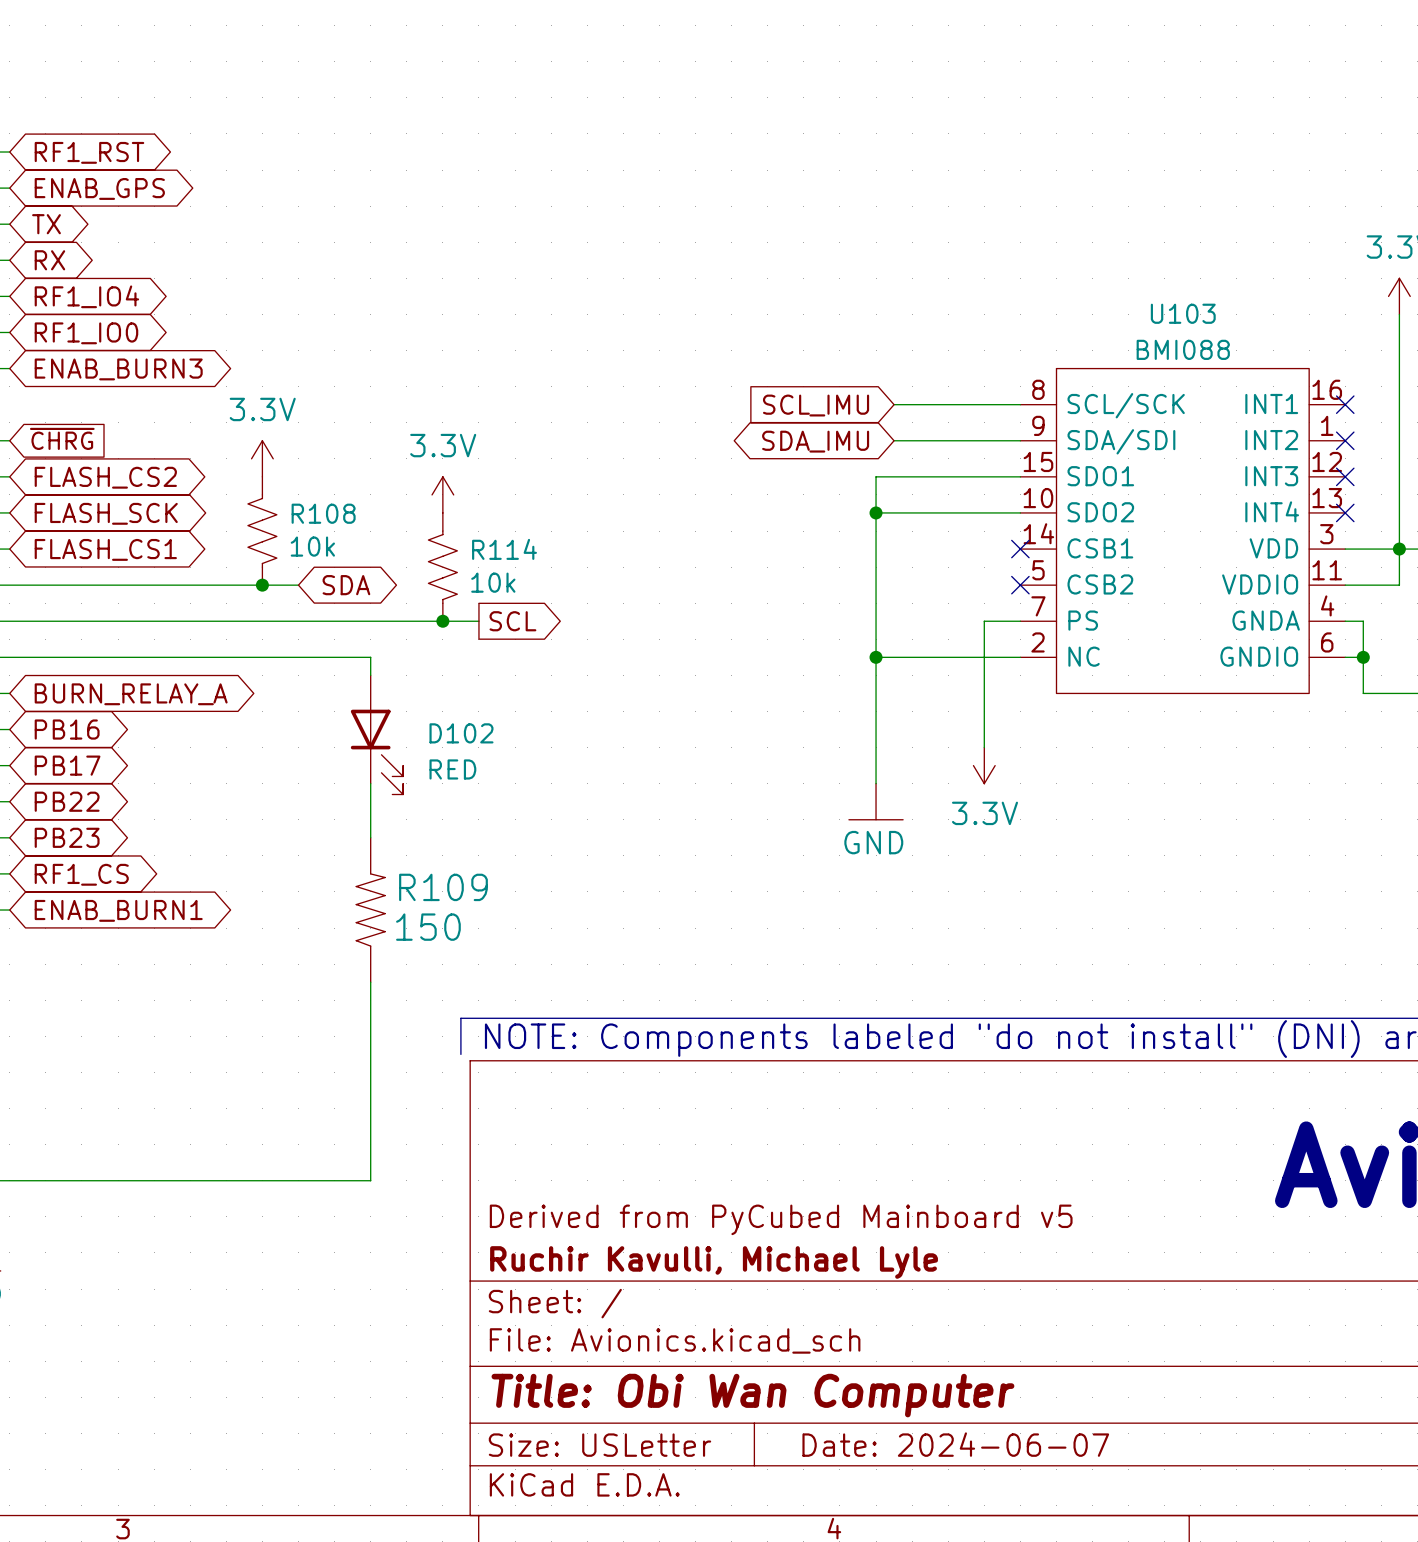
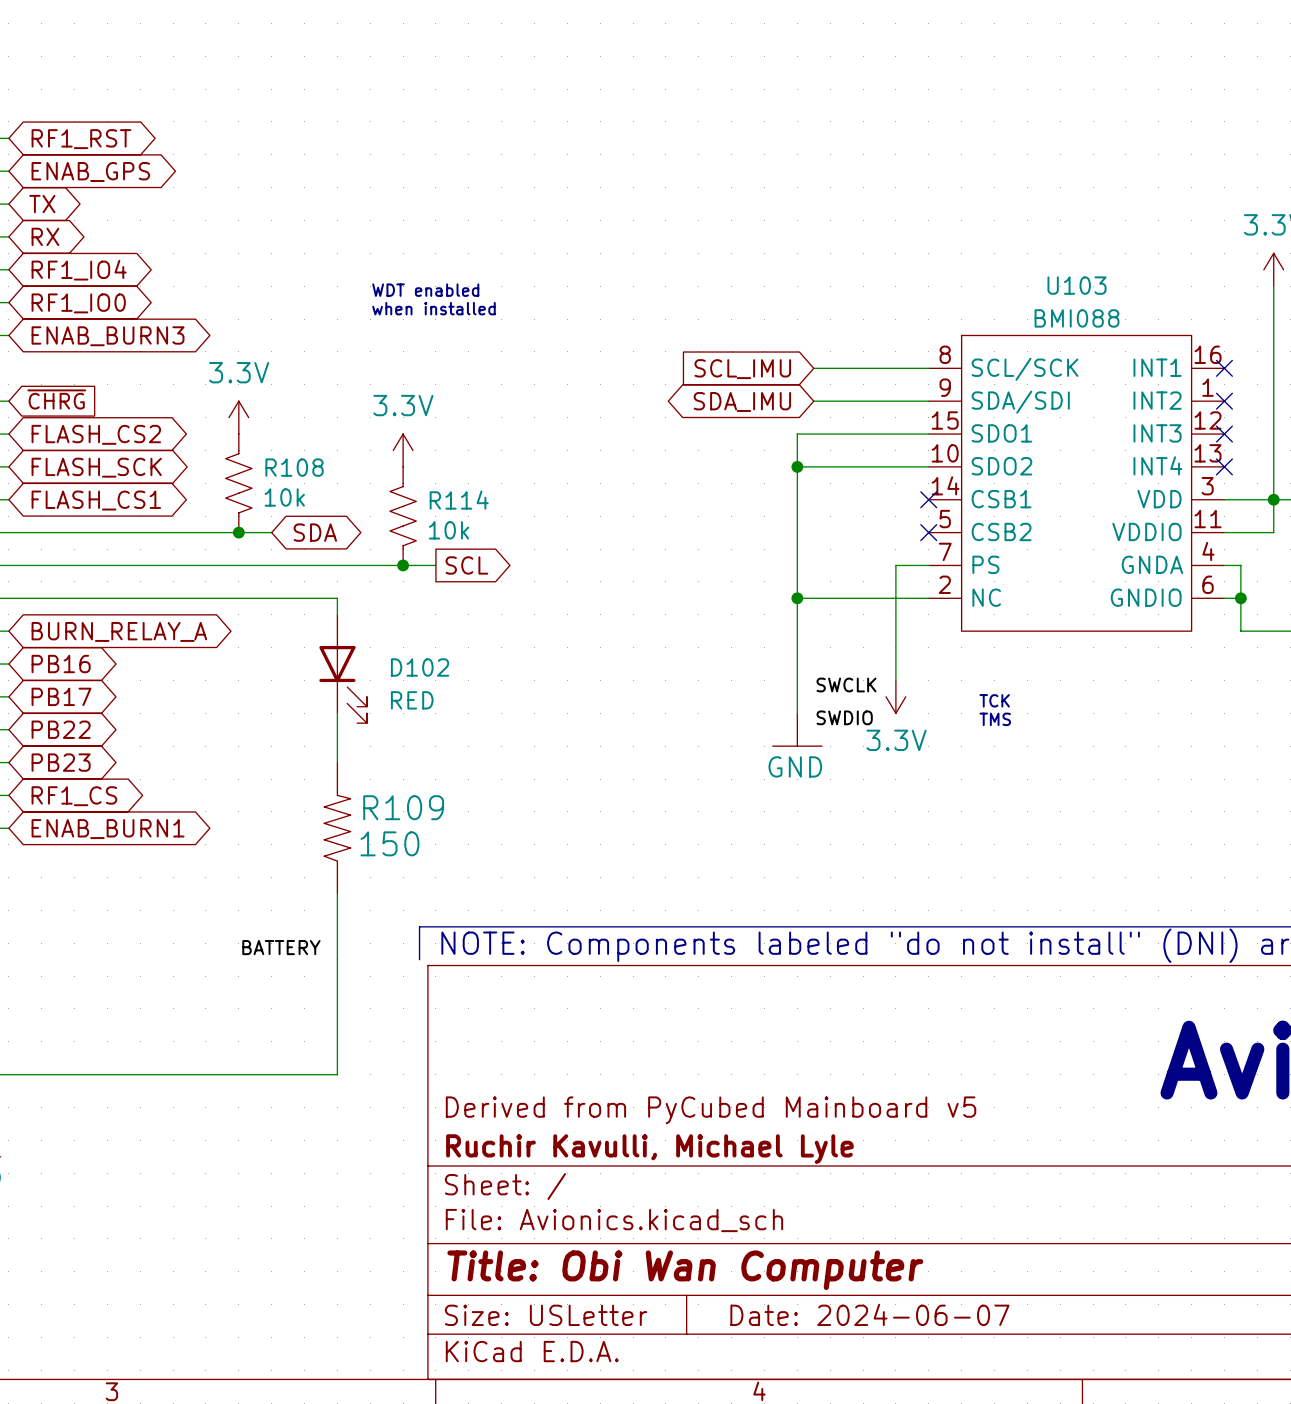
text: none -> WDT enabled (425, 290)
text: none -> when installed (433, 308)
label: none -> SWCLK (846, 685)
text: none -> TCK (994, 700)
label: none -> SWDIO (844, 717)
text: none -> TMS (995, 719)
label: none -> BATTERY (281, 947)

